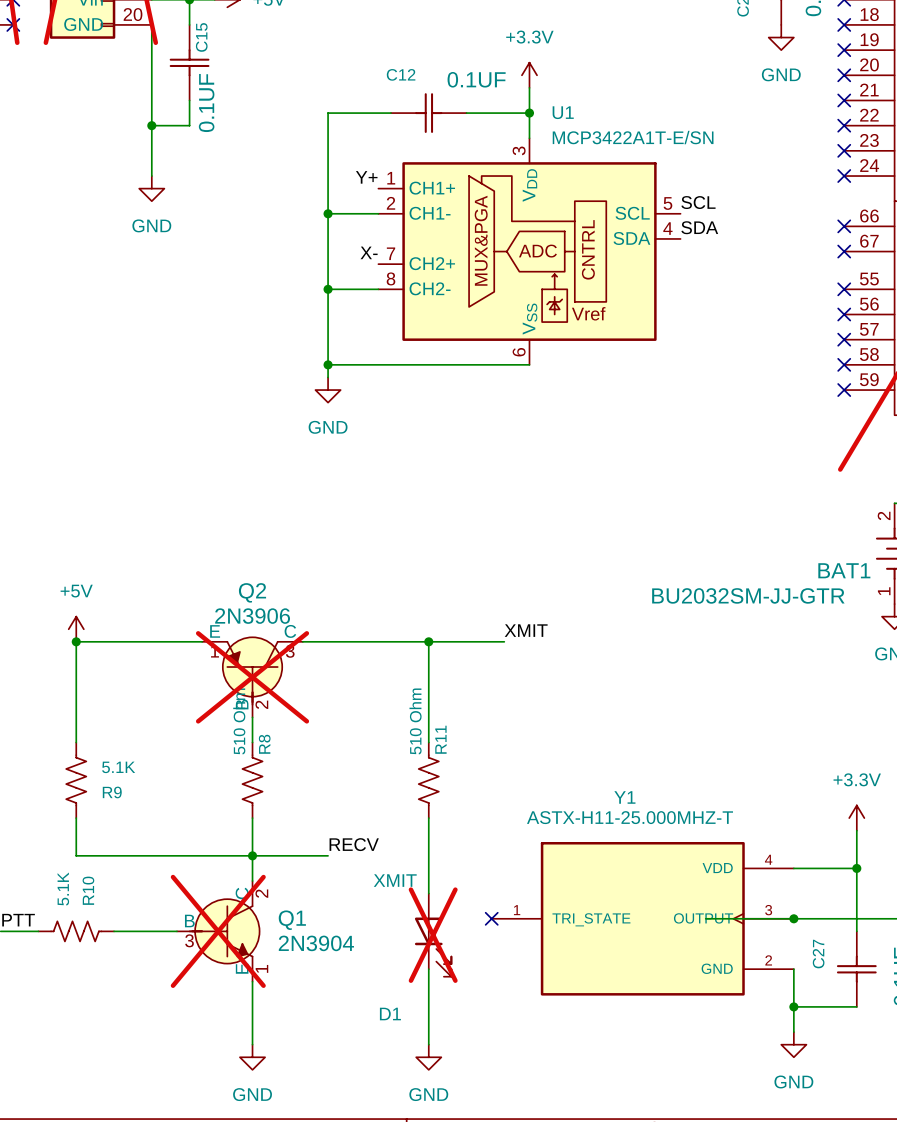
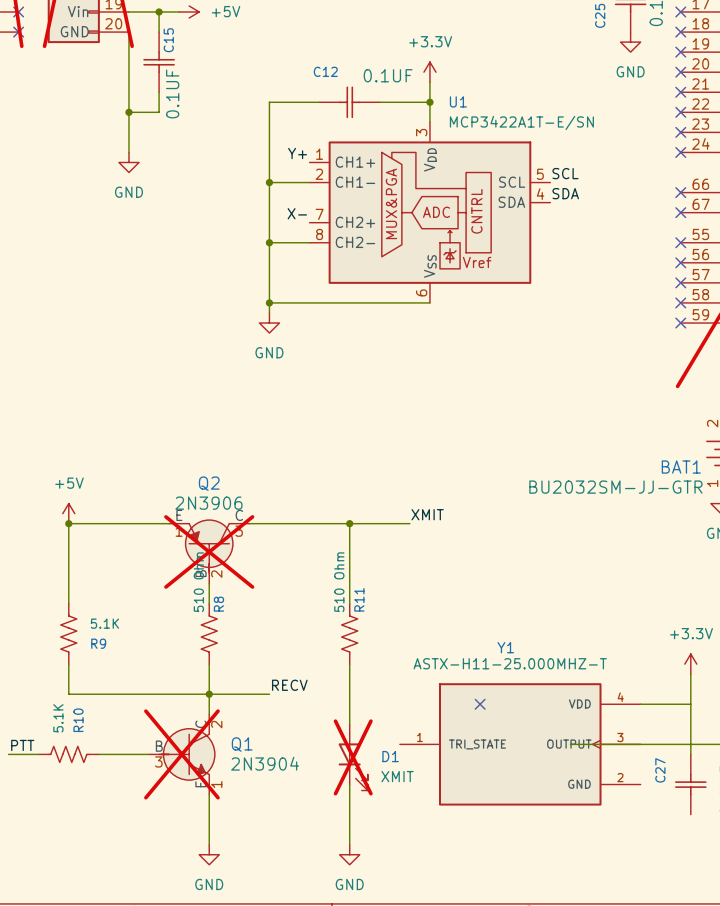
no-connect mark: none -> (480, 704)
junction: (856, 868) -> none
D1 value position: XMIT (395, 880) -> XMIT (397, 776)
no-connect mark: (491, 918) -> none
junction: (793, 918) -> none
wire: (793, 969) (793, 1032) -> none
wire: (793, 1006) (856, 1006) -> none
junction: (793, 1006) -> none
D1 name position: D1 (390, 1014) -> D1 (390, 756)
power symbol: GND (793, 1044) -> none

